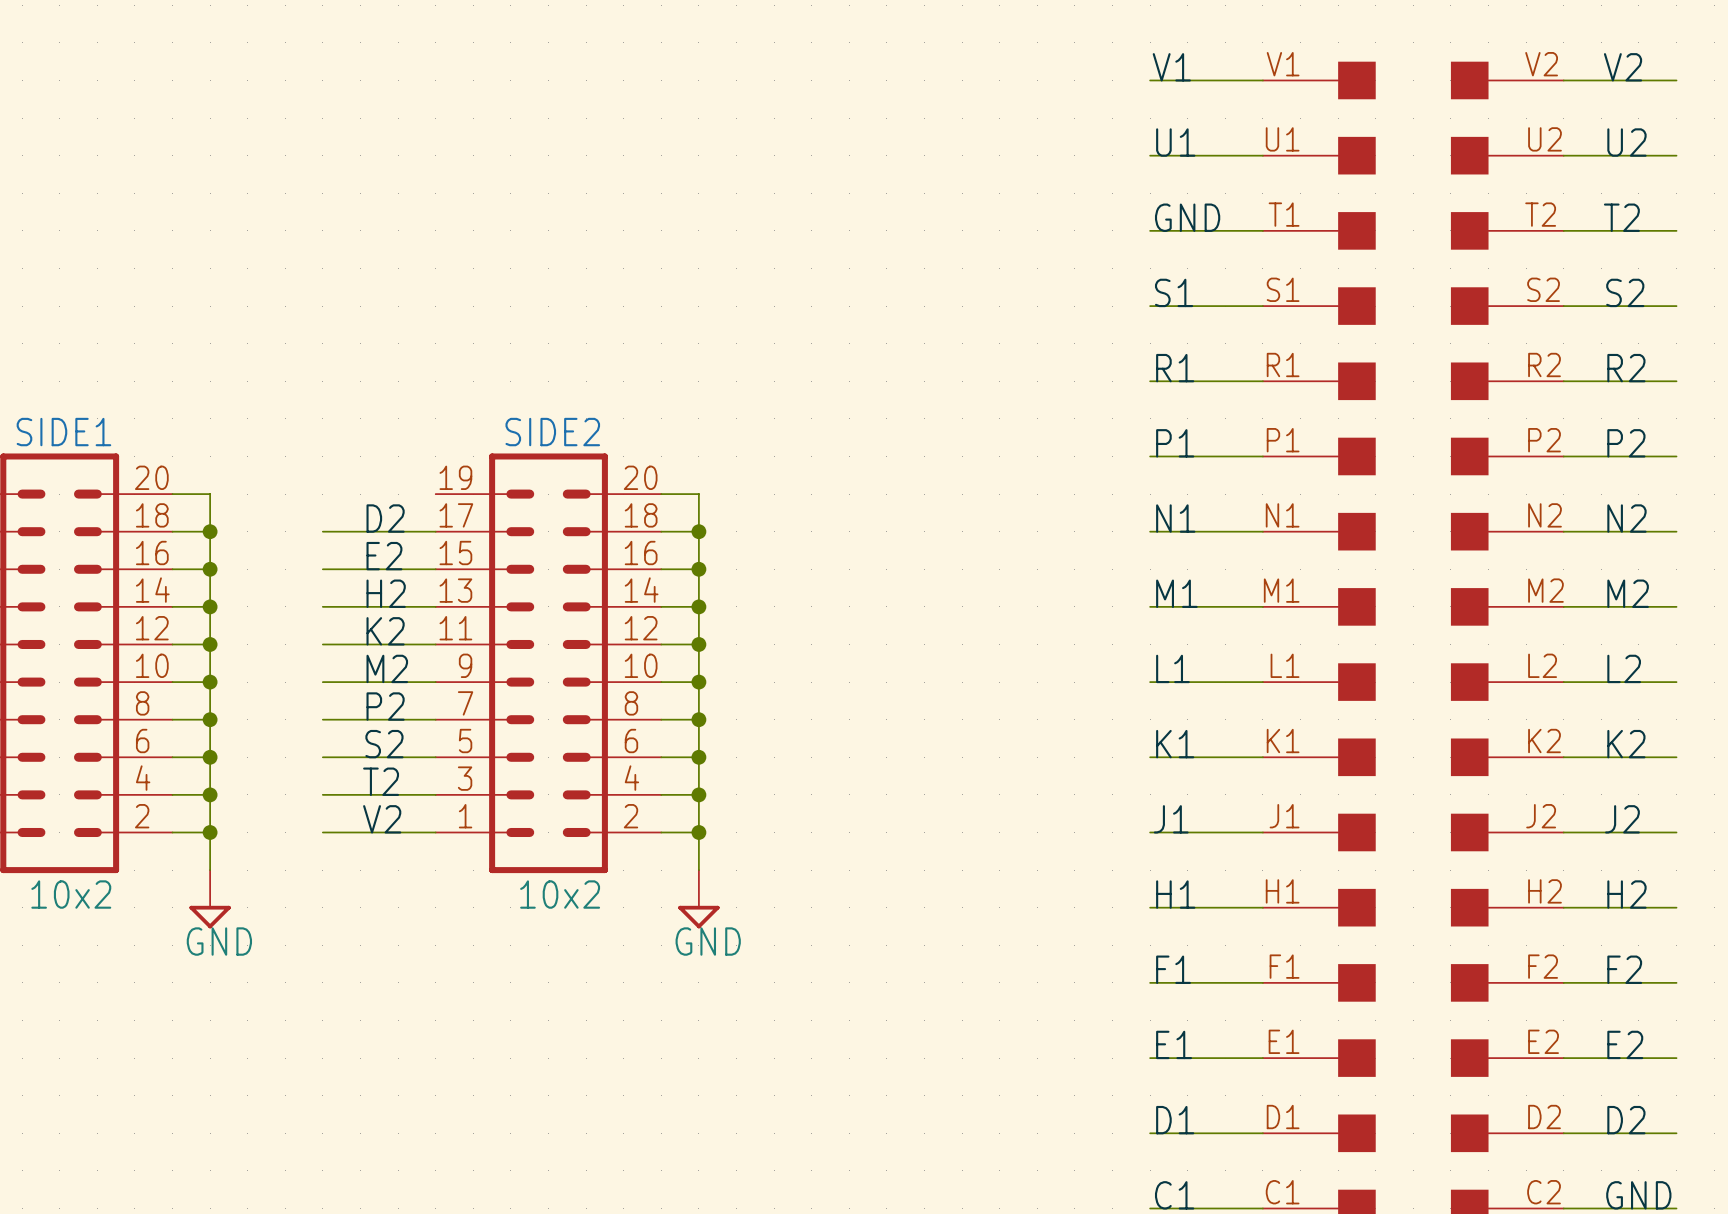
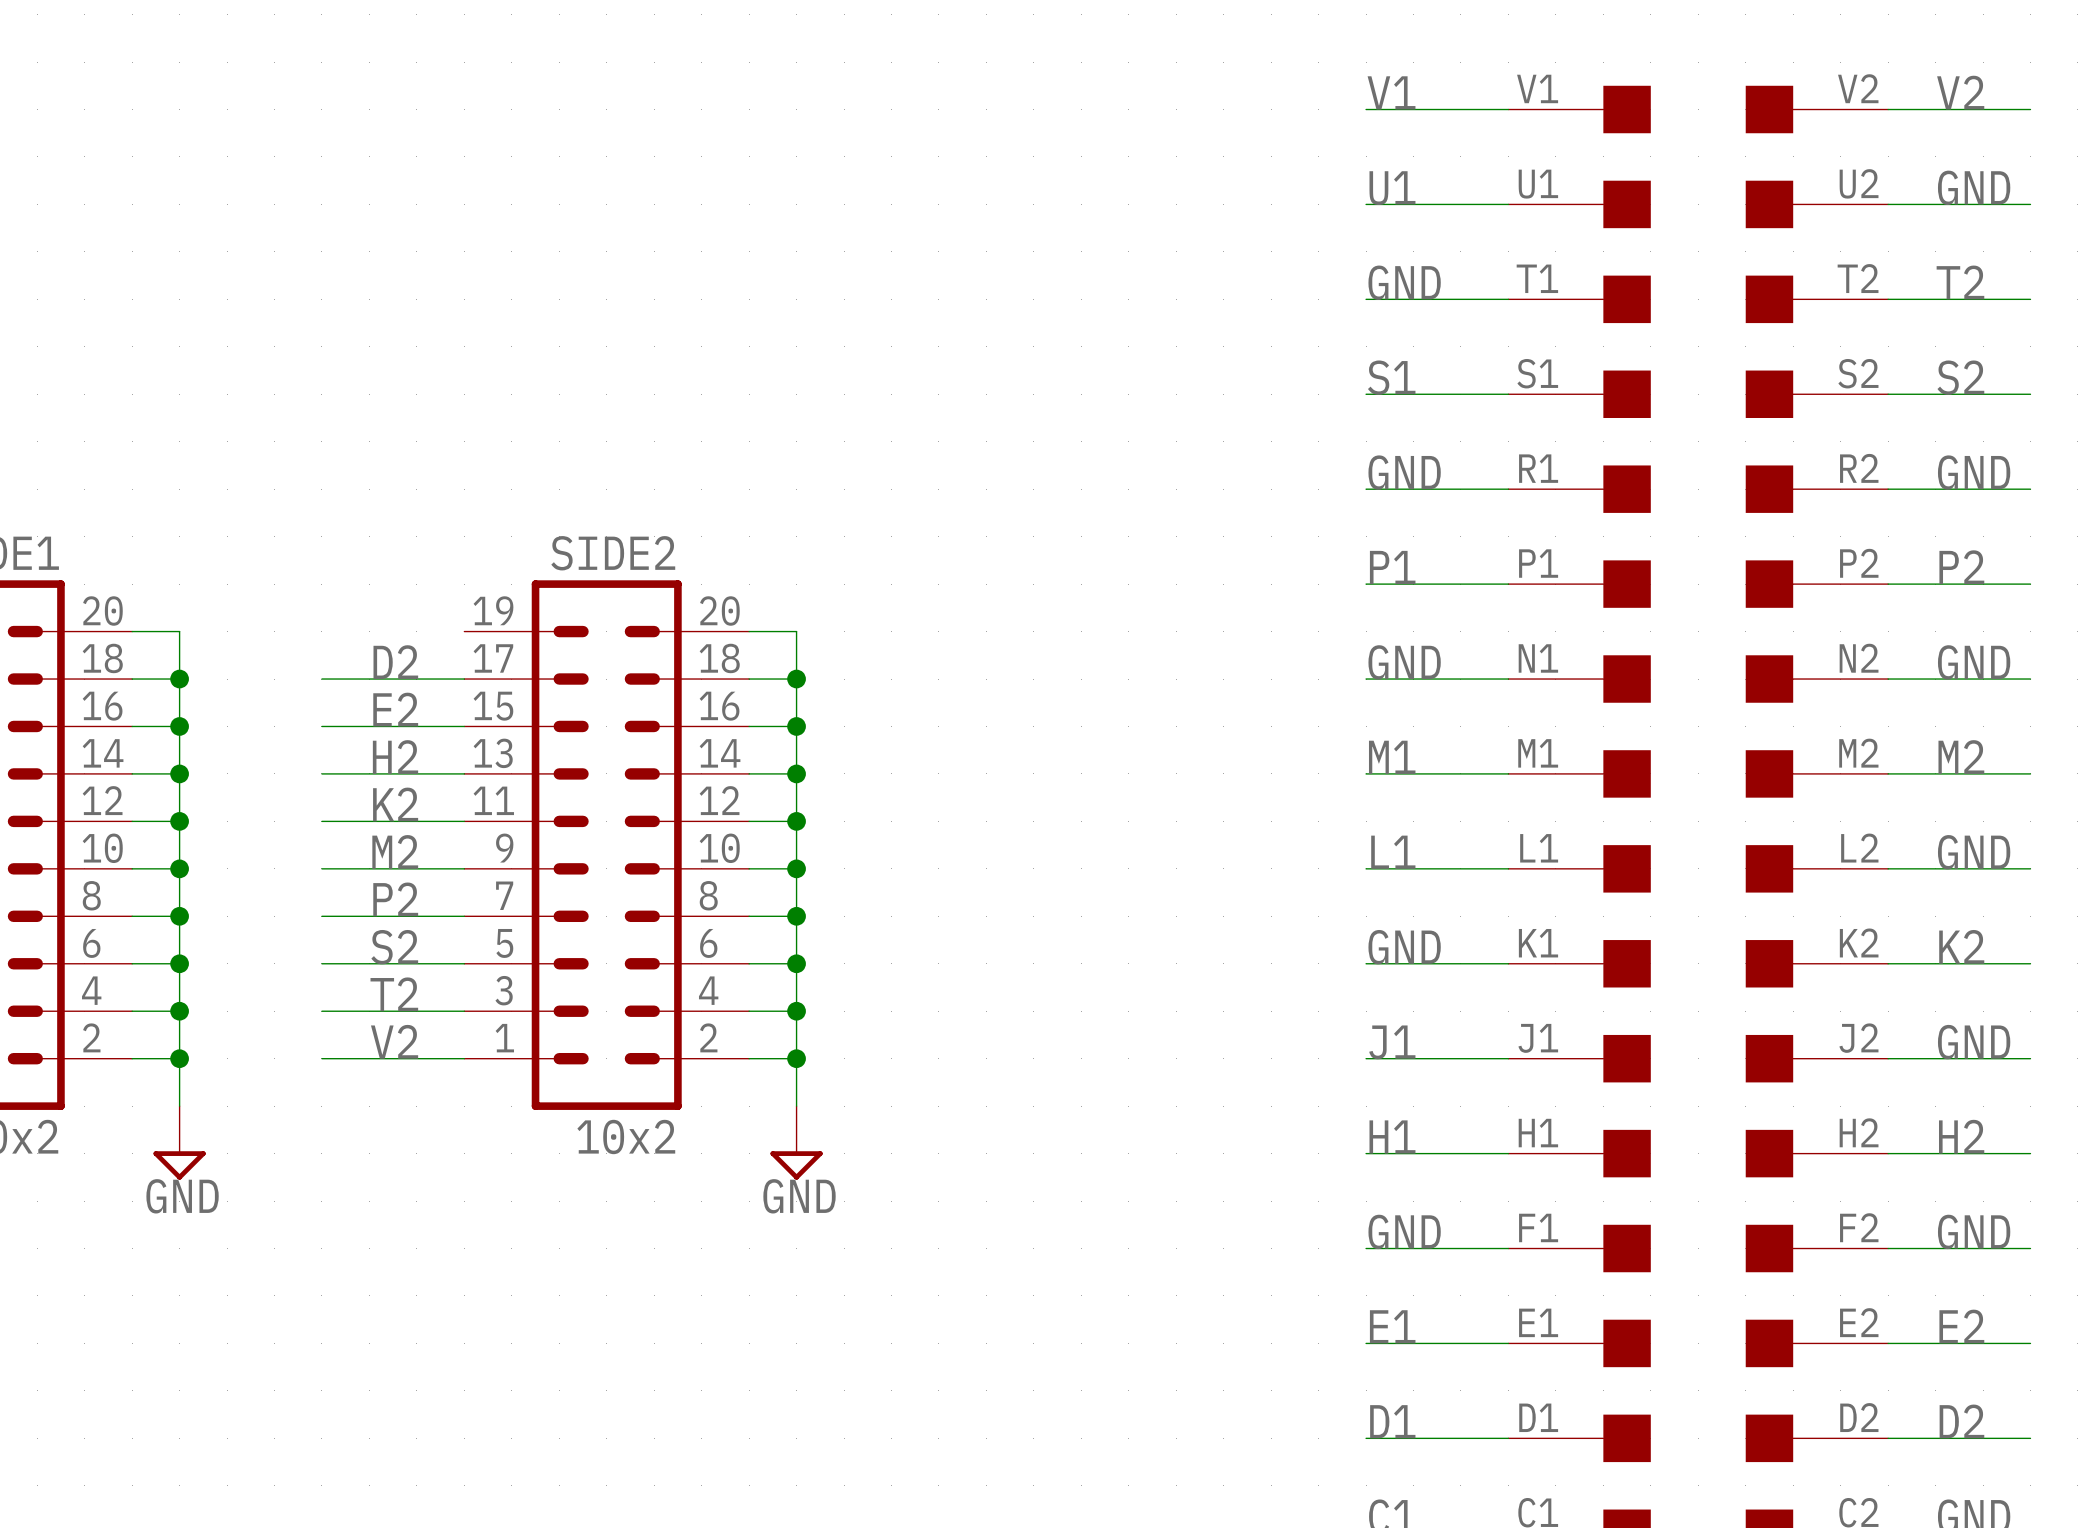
label: U2 (1626, 142) -> GND (1974, 187)
label: R1 (1175, 368) -> GND (1404, 472)
label: R2 (1626, 368) -> GND (1974, 472)
label: N1 (1175, 518) -> GND (1404, 662)
label: N2 (1626, 518) -> GND (1974, 662)
label: L2 (1624, 668) -> GND (1974, 852)
label: K1 (1175, 744) -> GND (1404, 947)
label: J2 (1622, 819) -> GND (1974, 1042)
label: F1 (1173, 969) -> GND (1404, 1231)
label: F2 (1624, 969) -> GND (1974, 1231)

